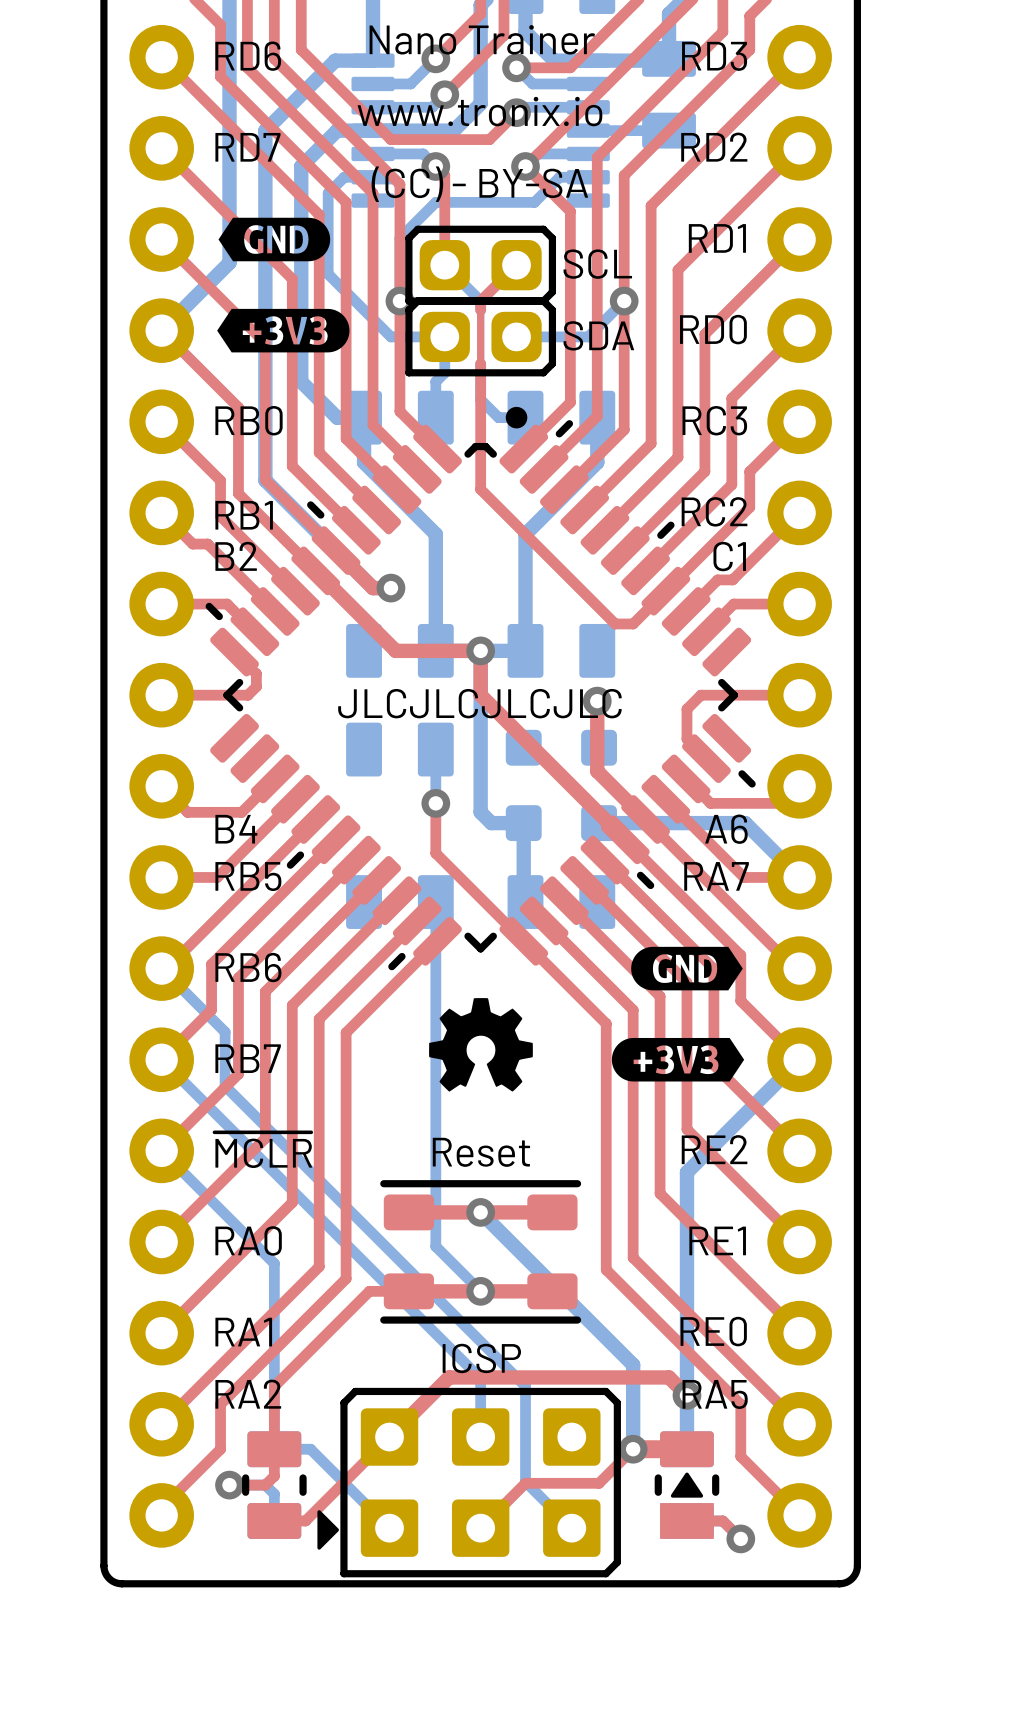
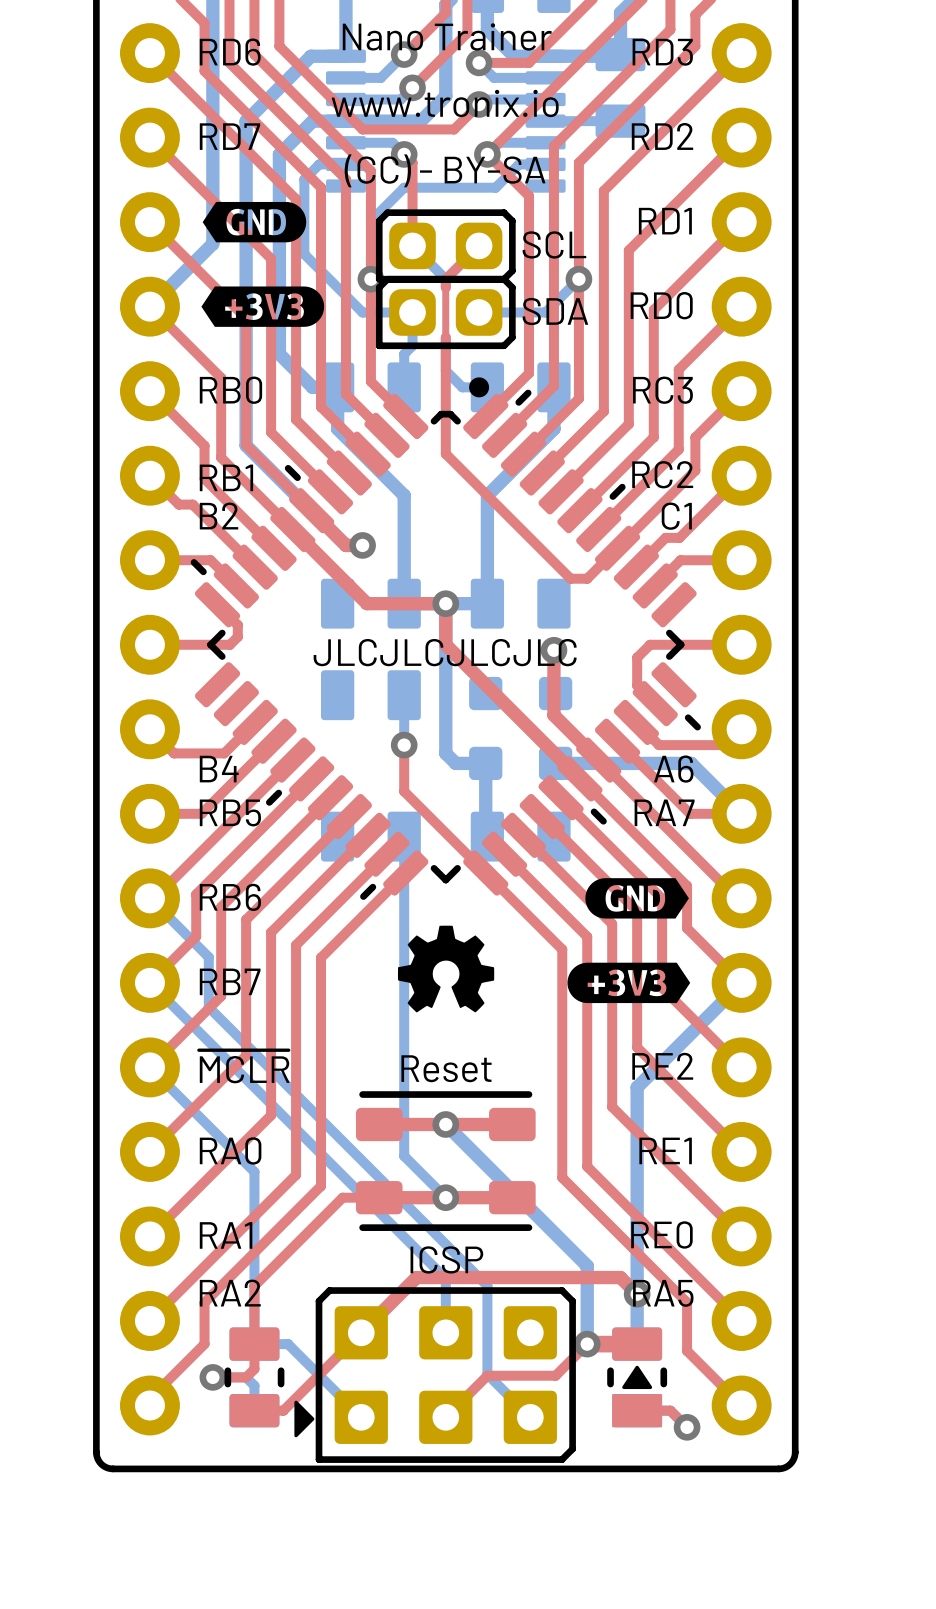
part footprint: [380, 1180, 582, 1324] -> [355, 1091, 536, 1231]

